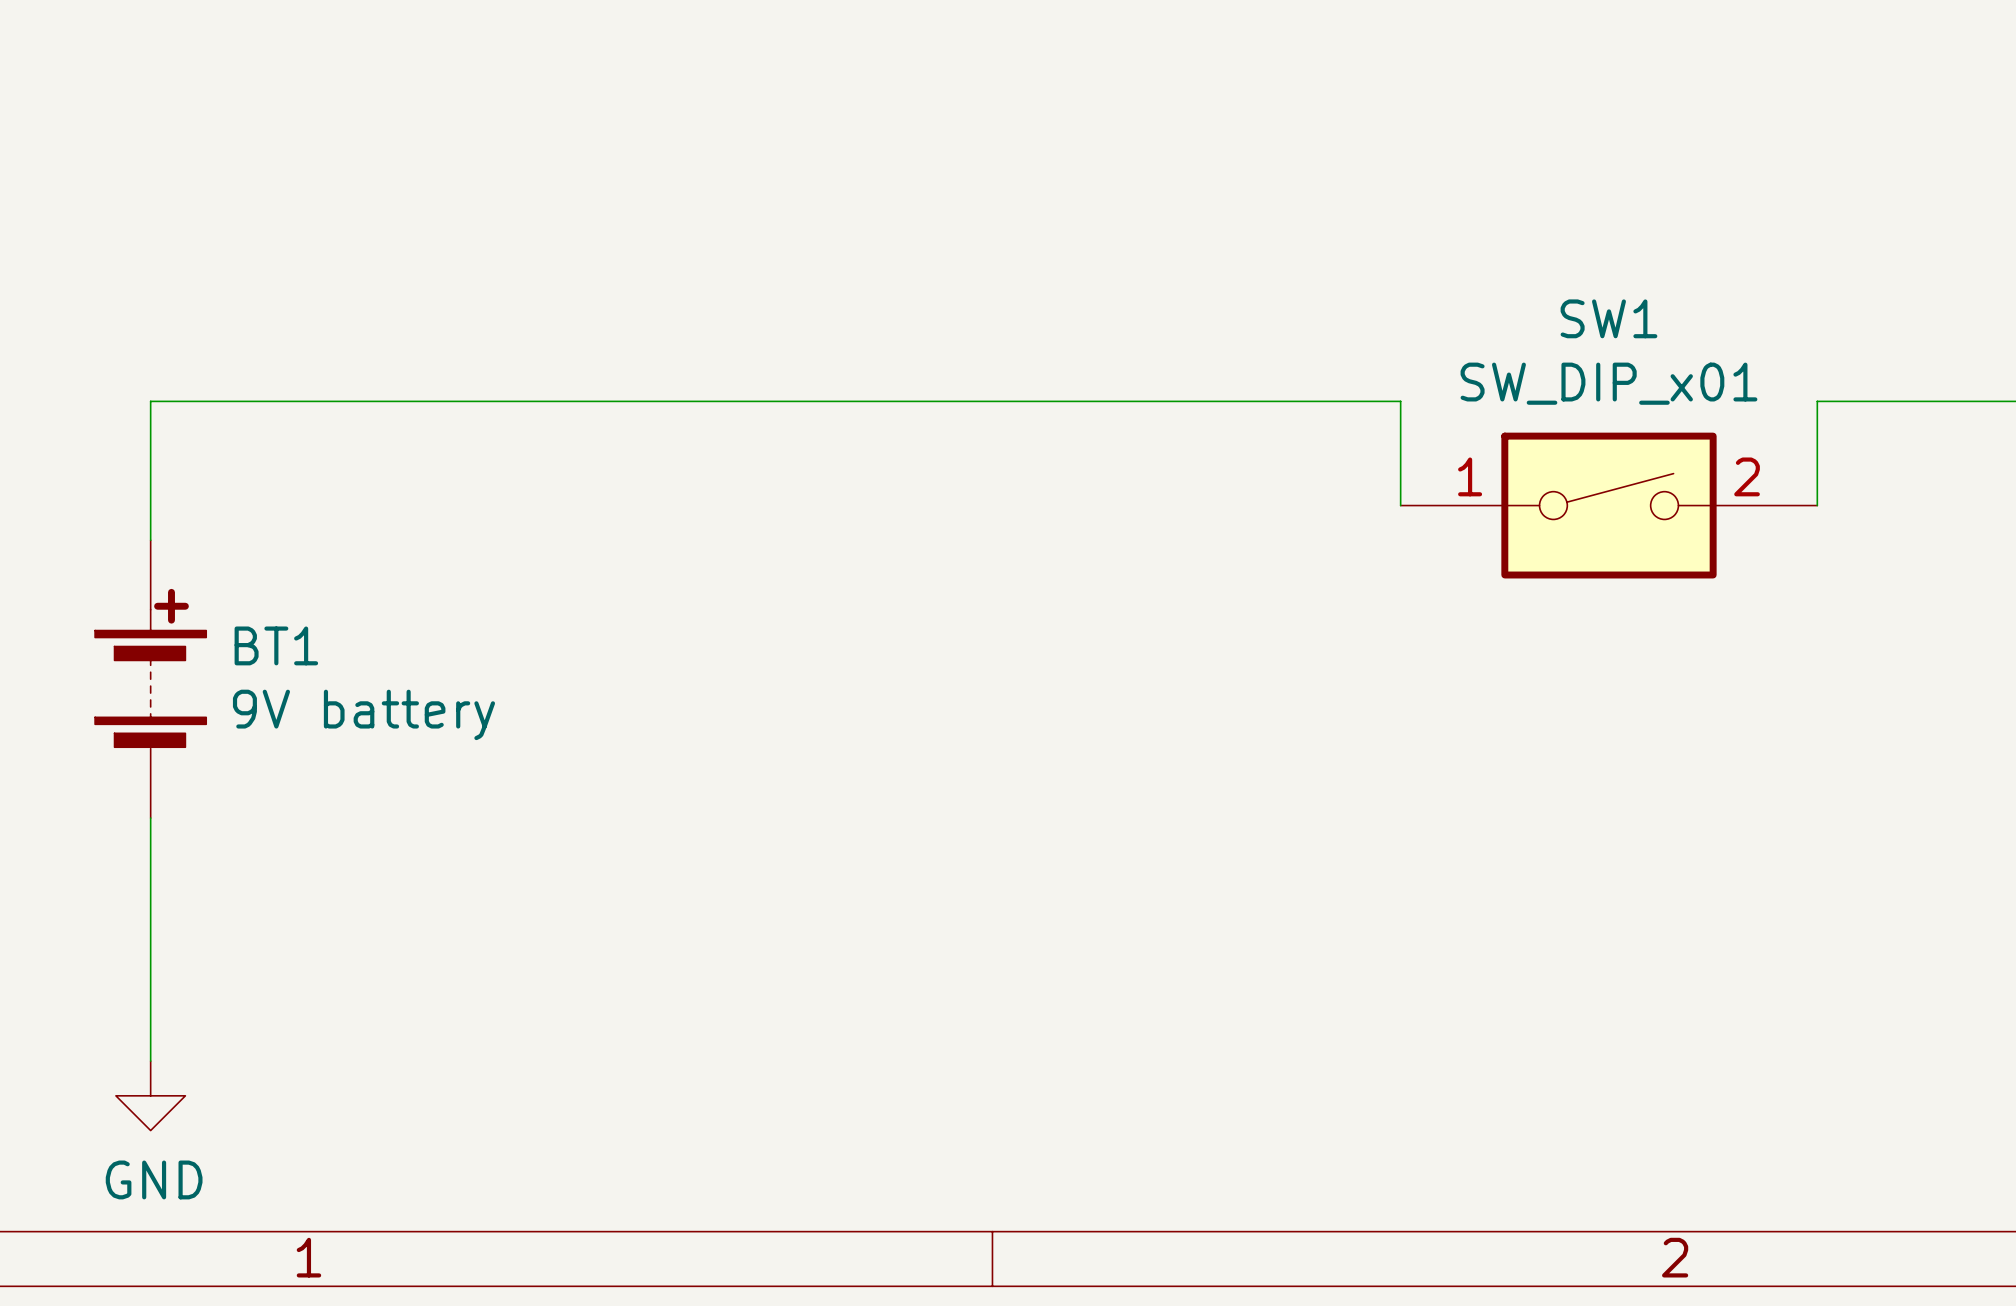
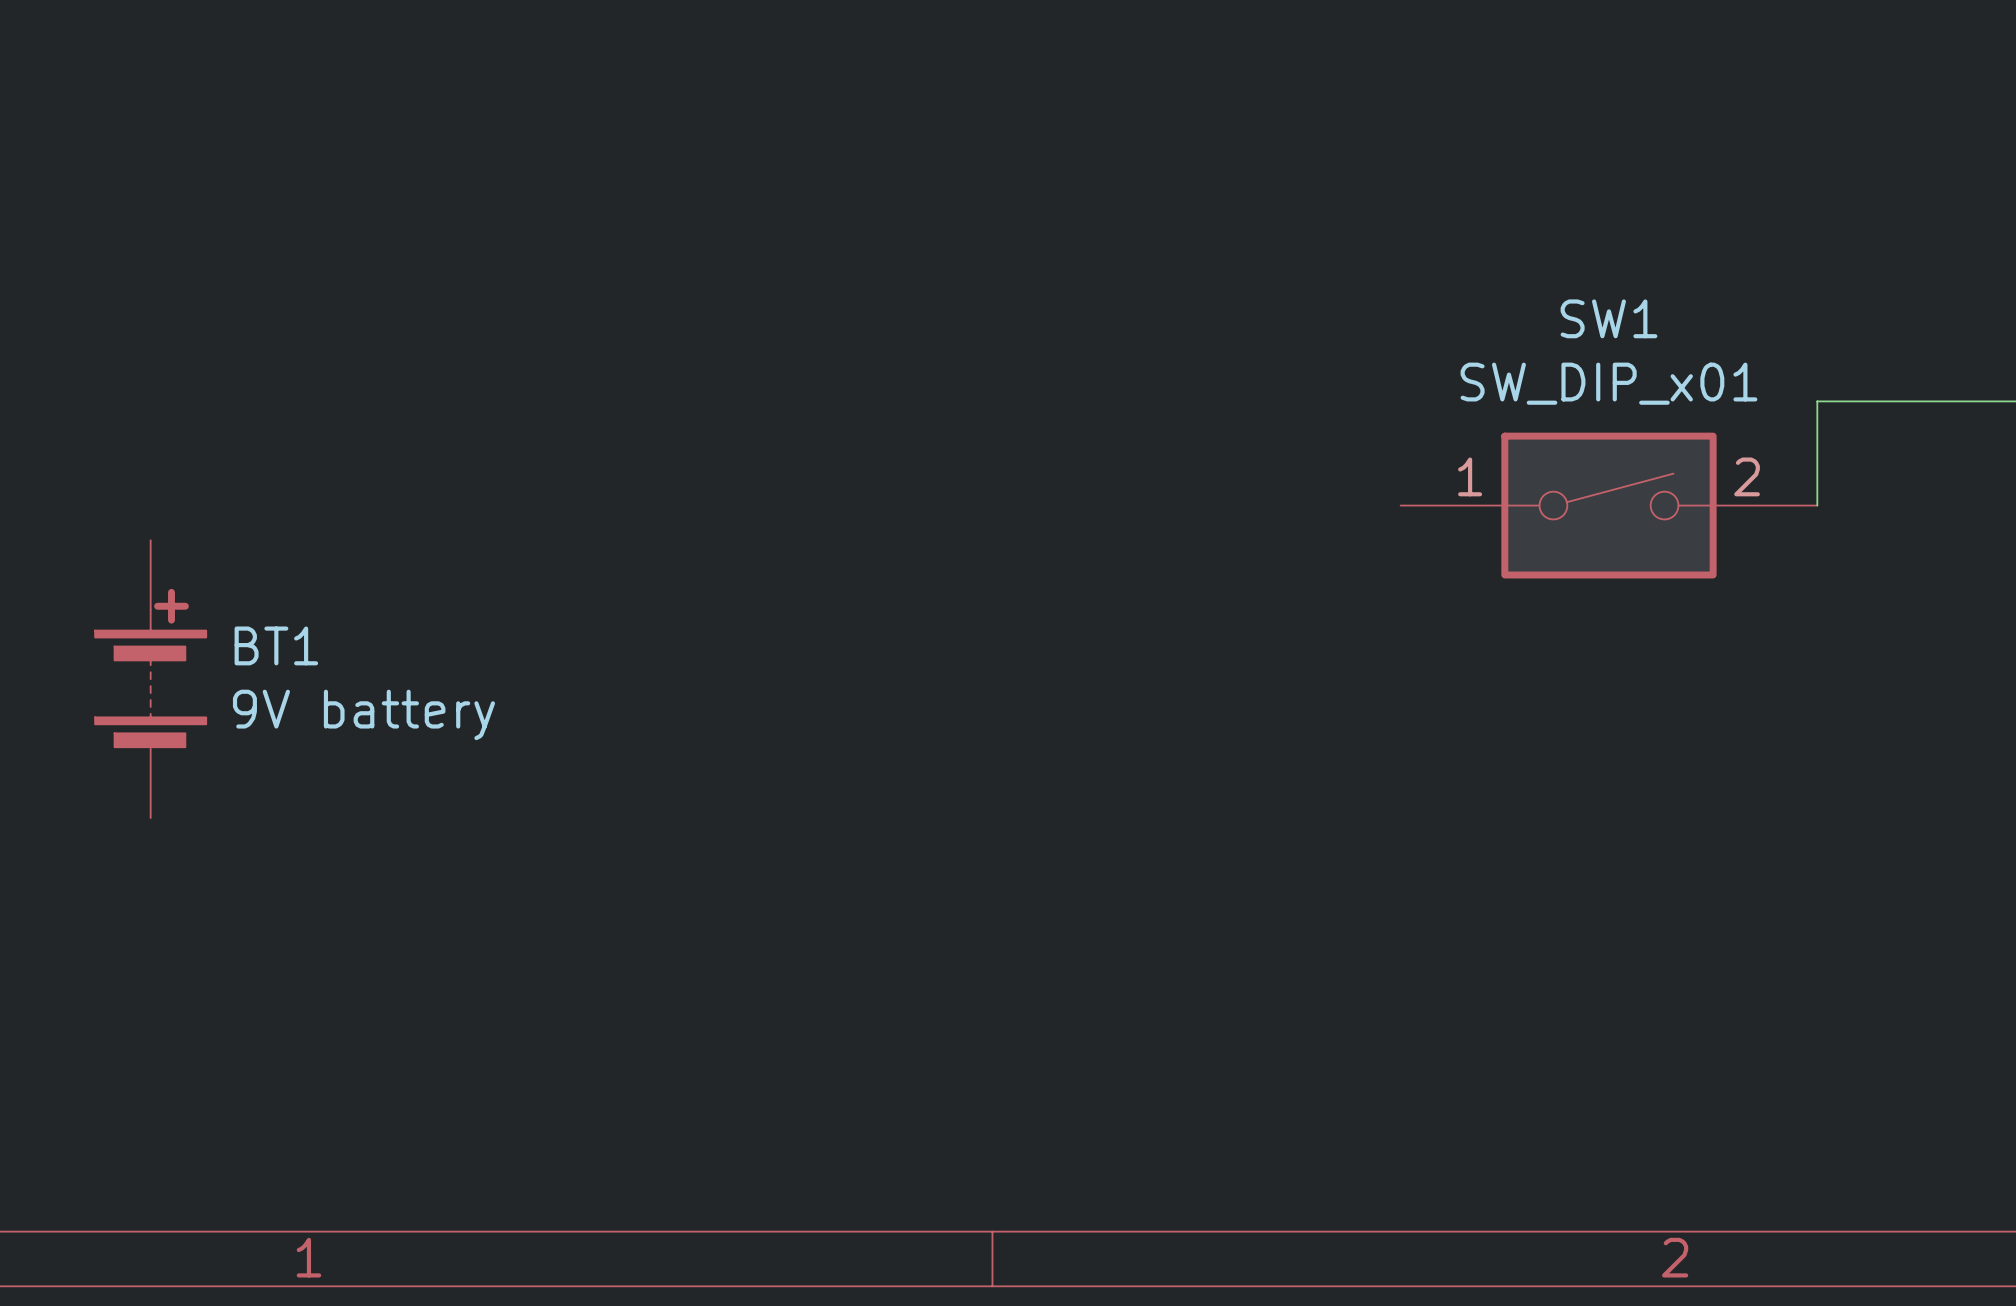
wire: (1400, 505) (1400, 401) (150, 401) (150, 540) -> none
wire: (150, 818) (150, 1061) -> none
power symbol: GND (150, 1095) -> none

